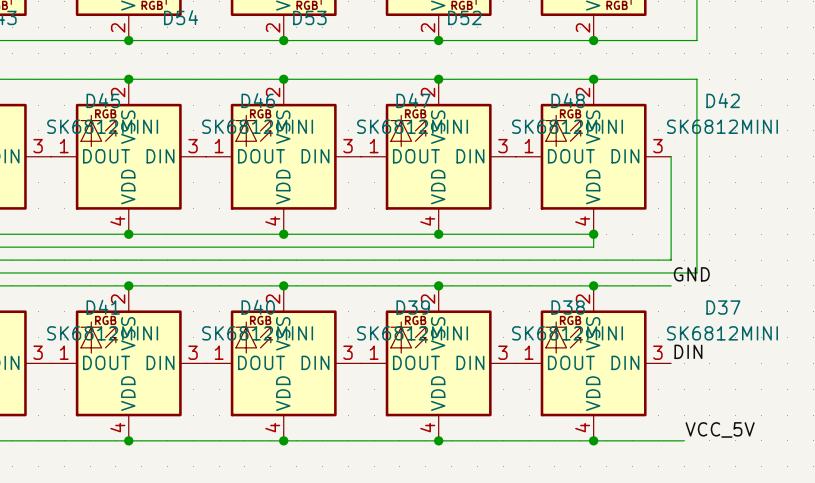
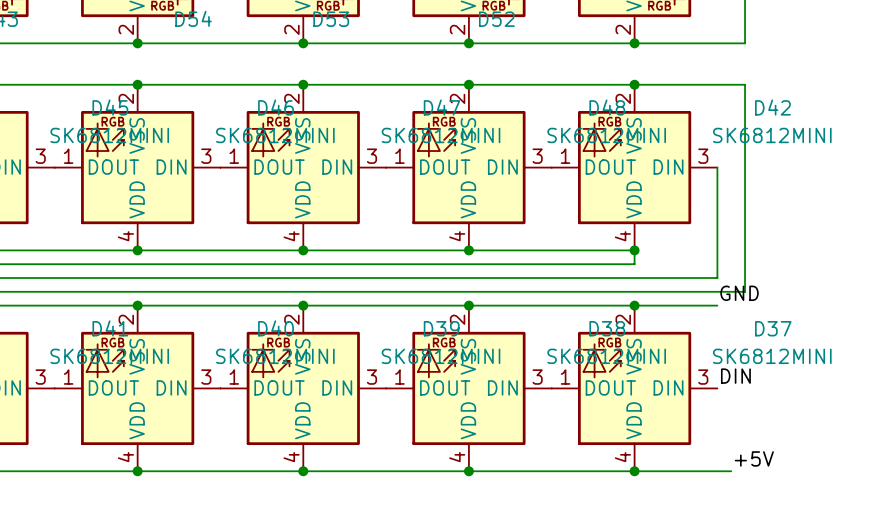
label: VCC_5V (720, 429) -> +5V (754, 458)

